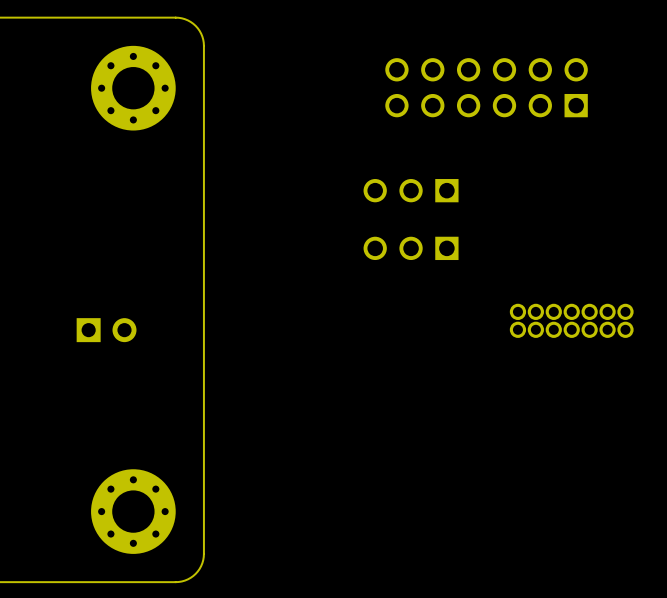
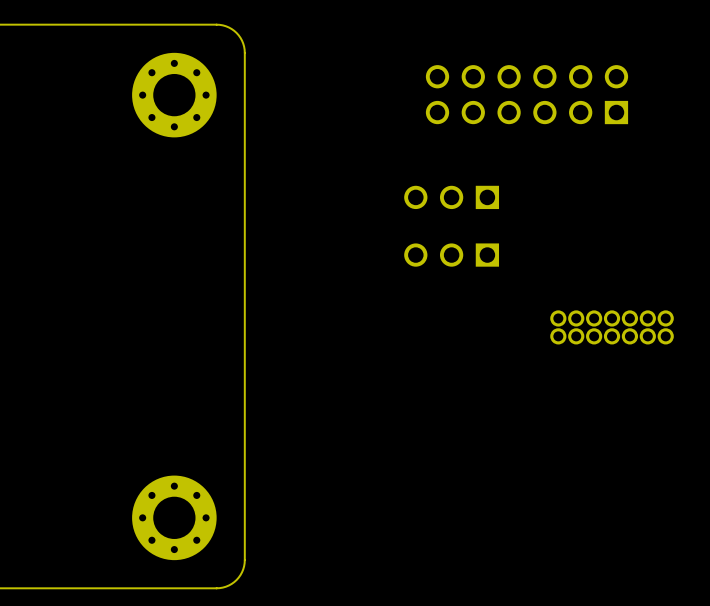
part: (106, 330) -> none

